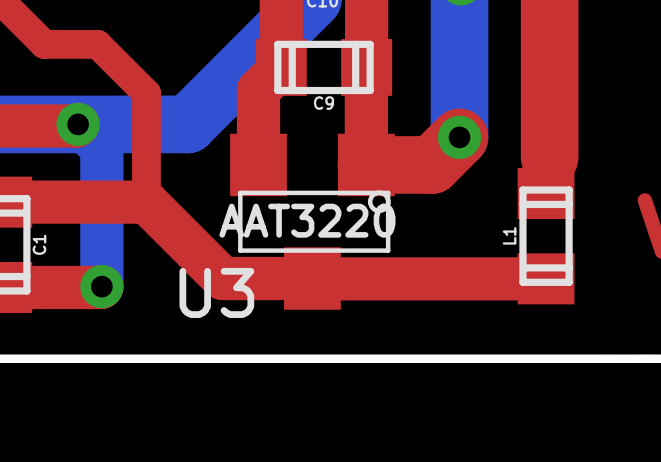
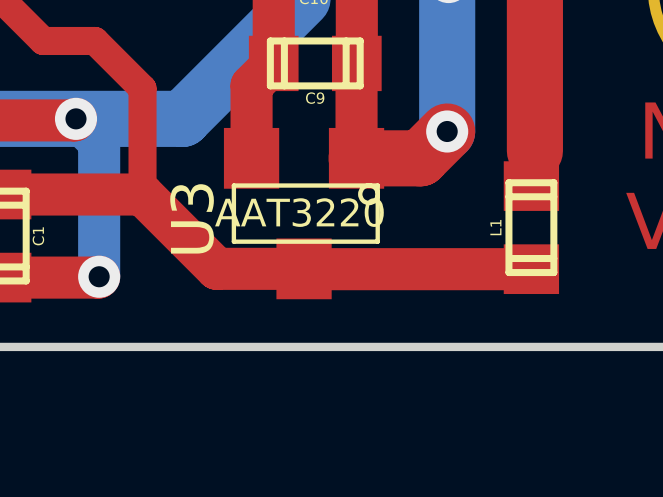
U3 name rotation: 0° (216, 292) -> 90° counterclockwise (192, 218)

